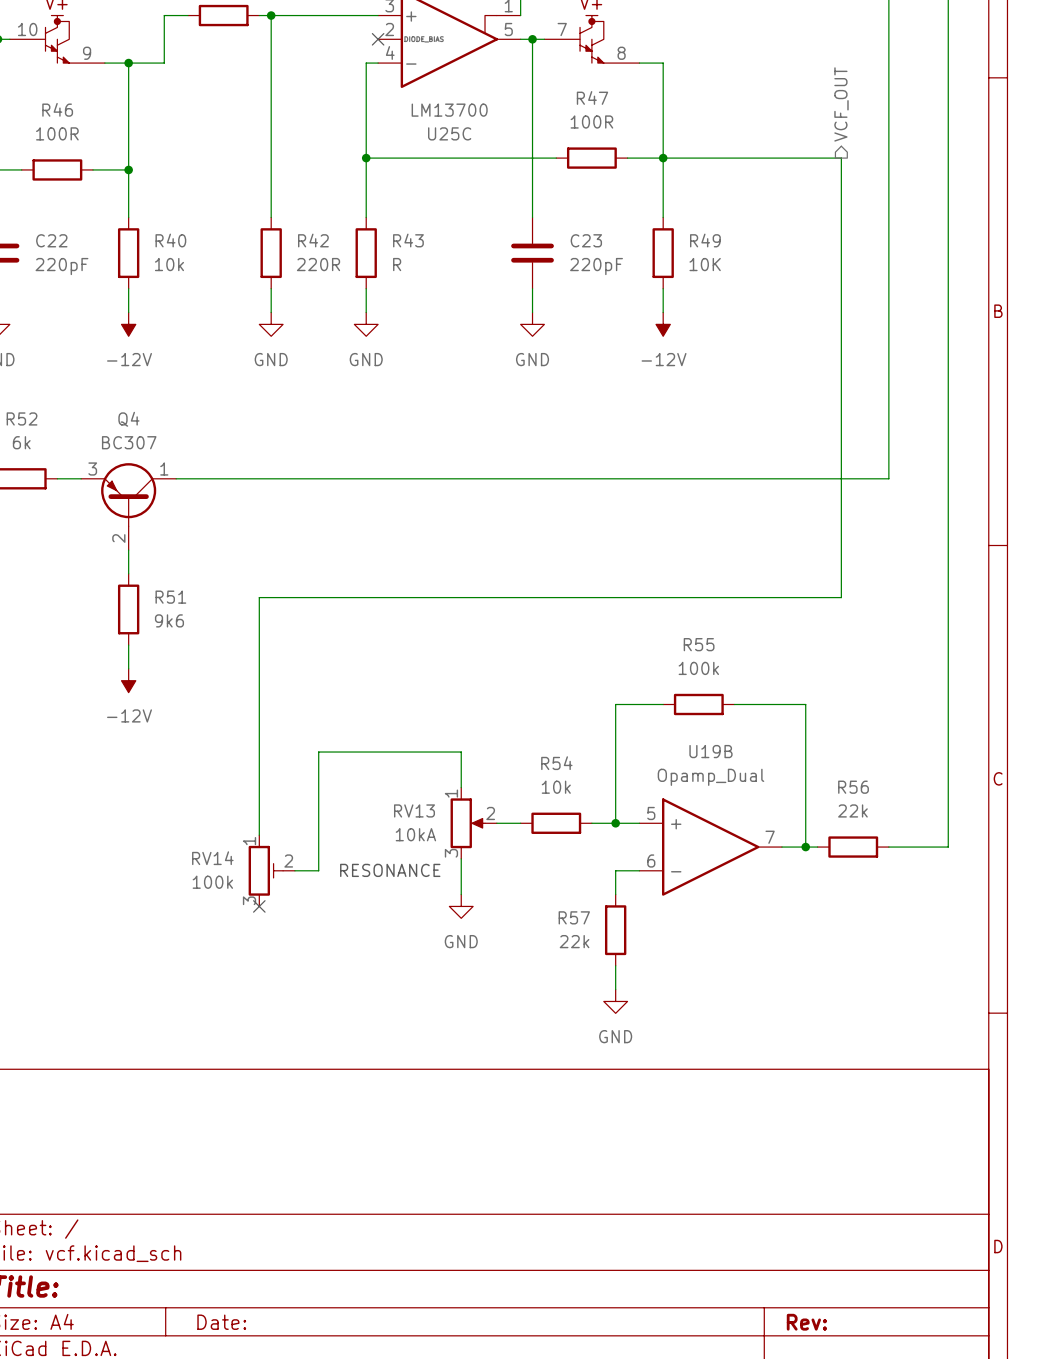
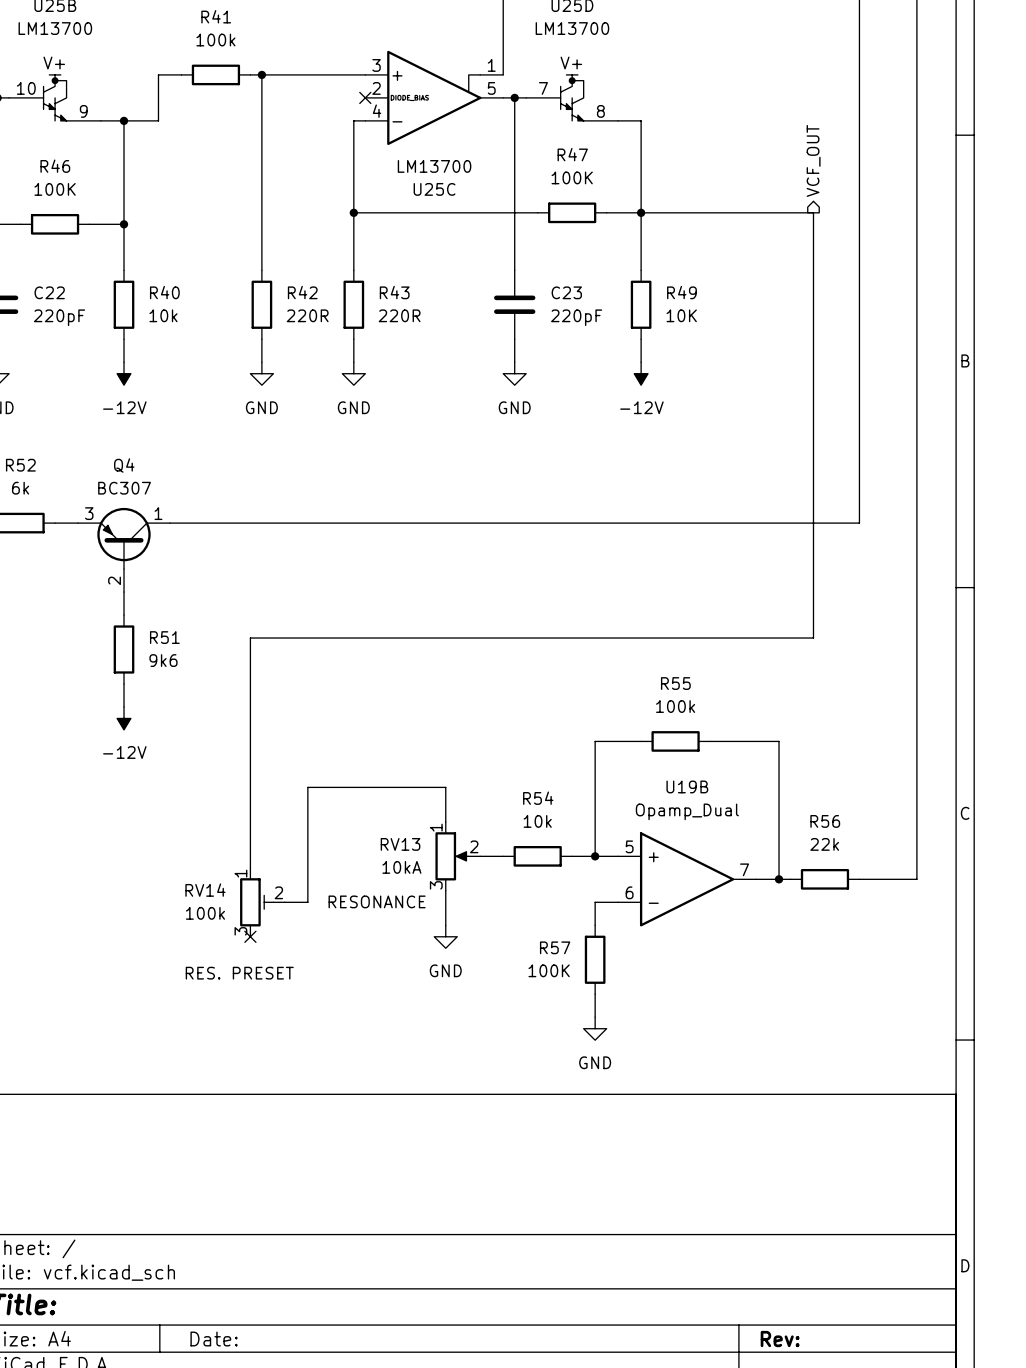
R47 value: 100R (591, 122) -> 100K (572, 177)
R46 value: 100R (57, 133) -> 100K (55, 189)
R43 value: R (397, 264) -> 220R (399, 315)
R57 value: 22k (574, 941) -> 100K (549, 970)
text: none -> RES. PRESET (239, 973)

